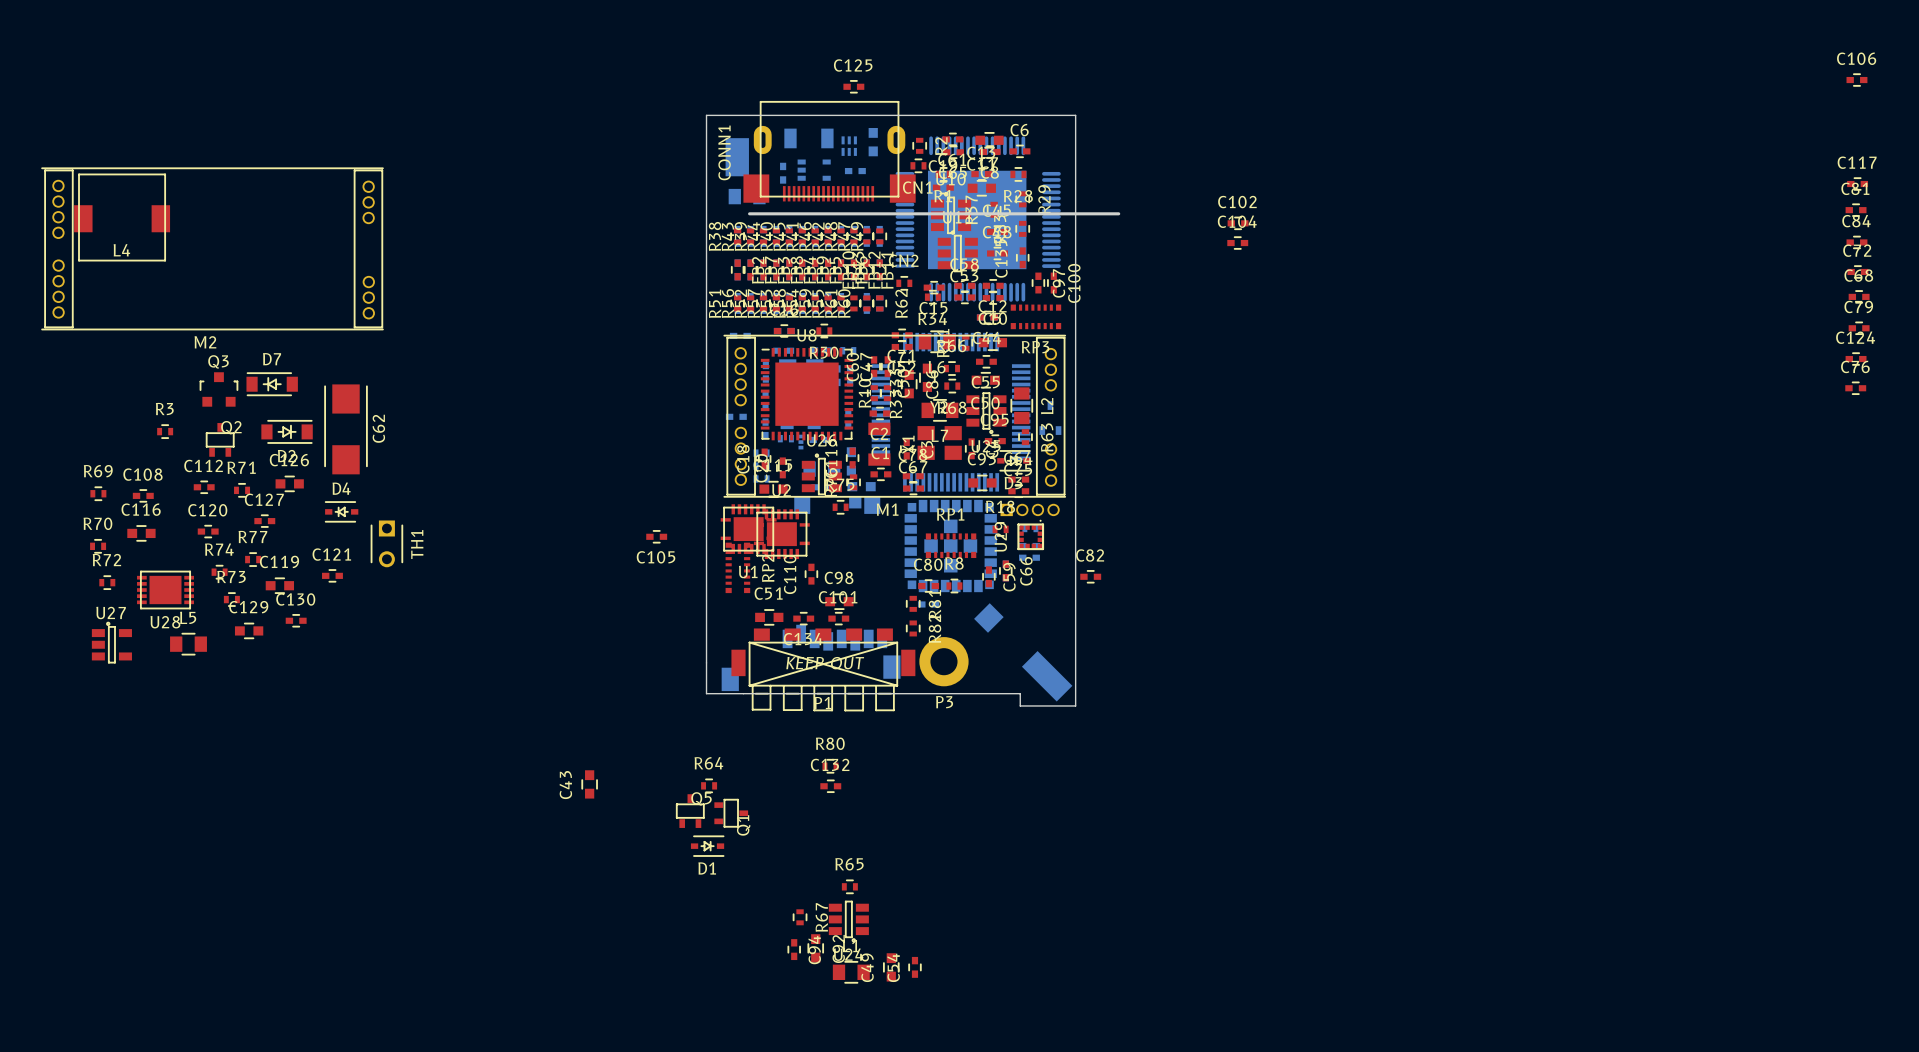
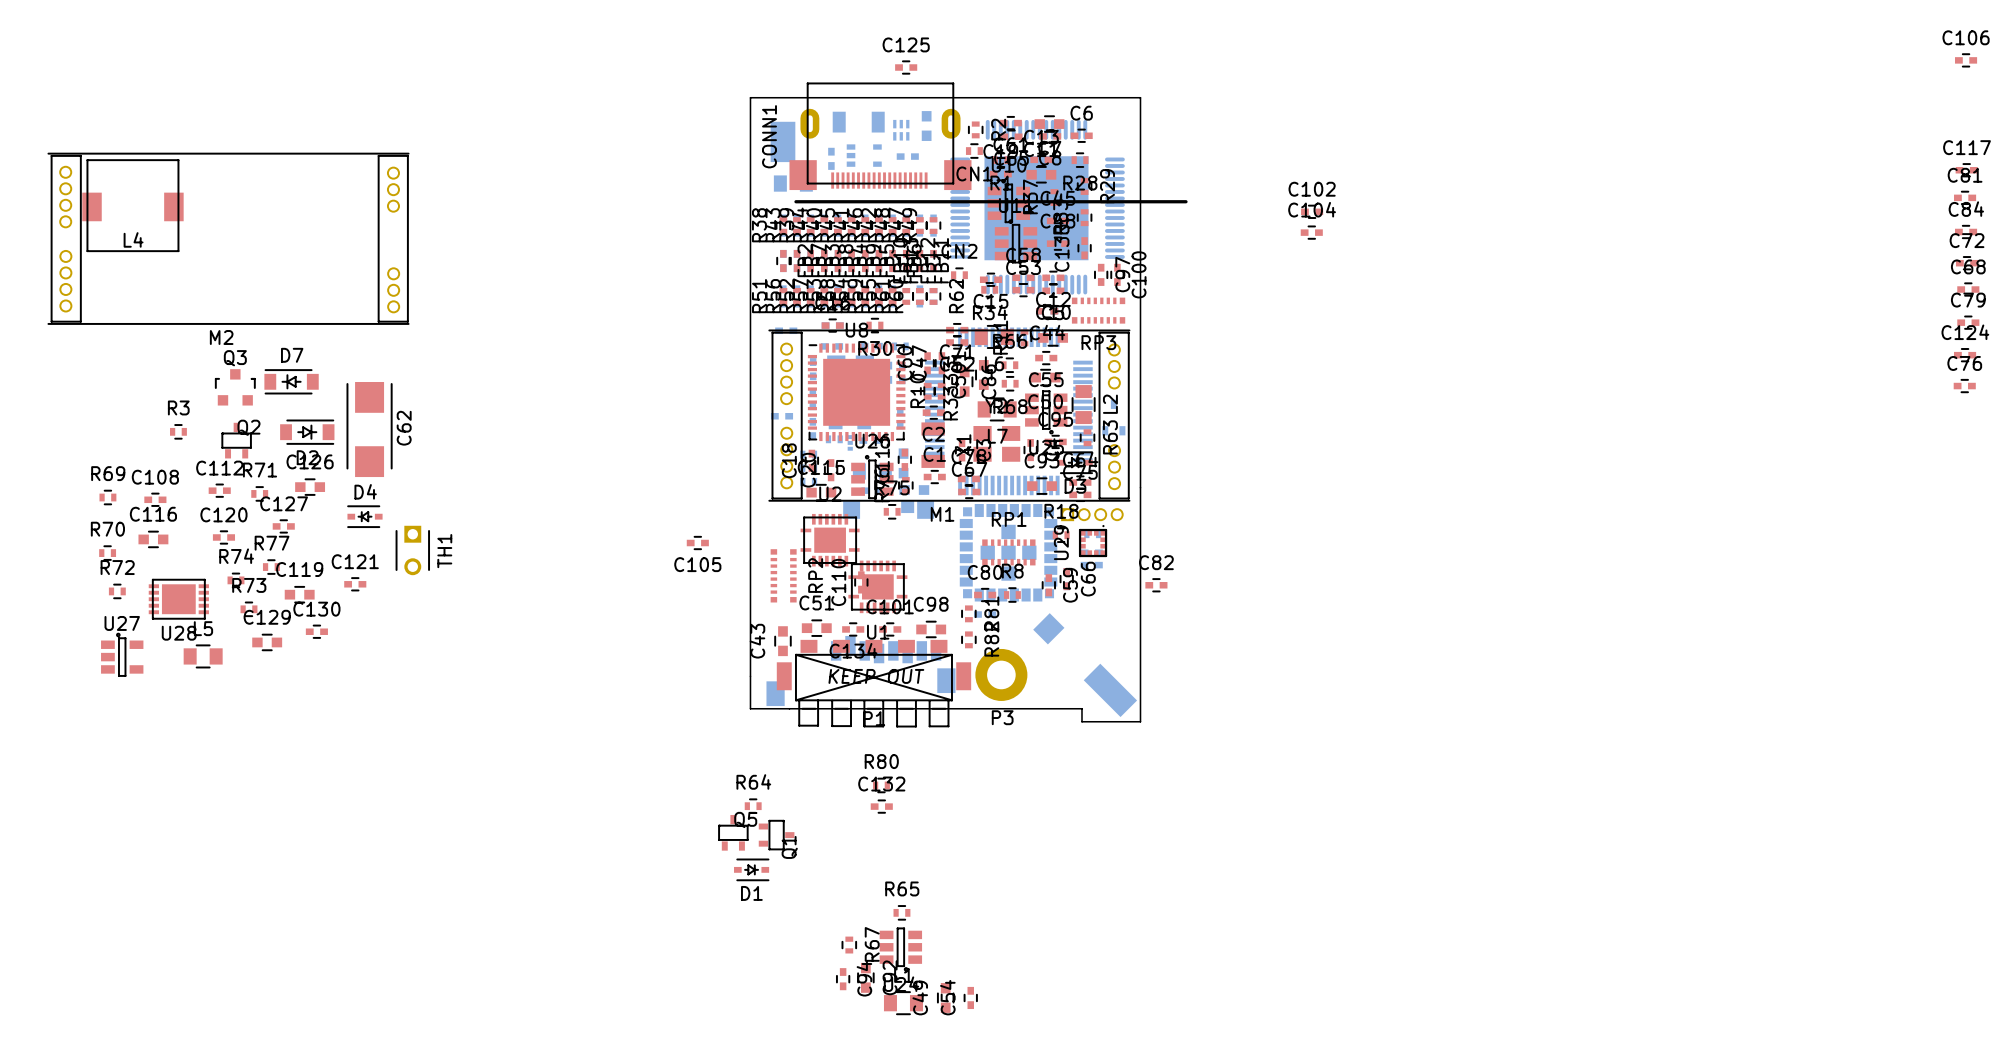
U1 position: (748, 529) -> (877, 586)
C98 position: (839, 601) -> (931, 629)
C43 position: (589, 784) -> (782, 641)

